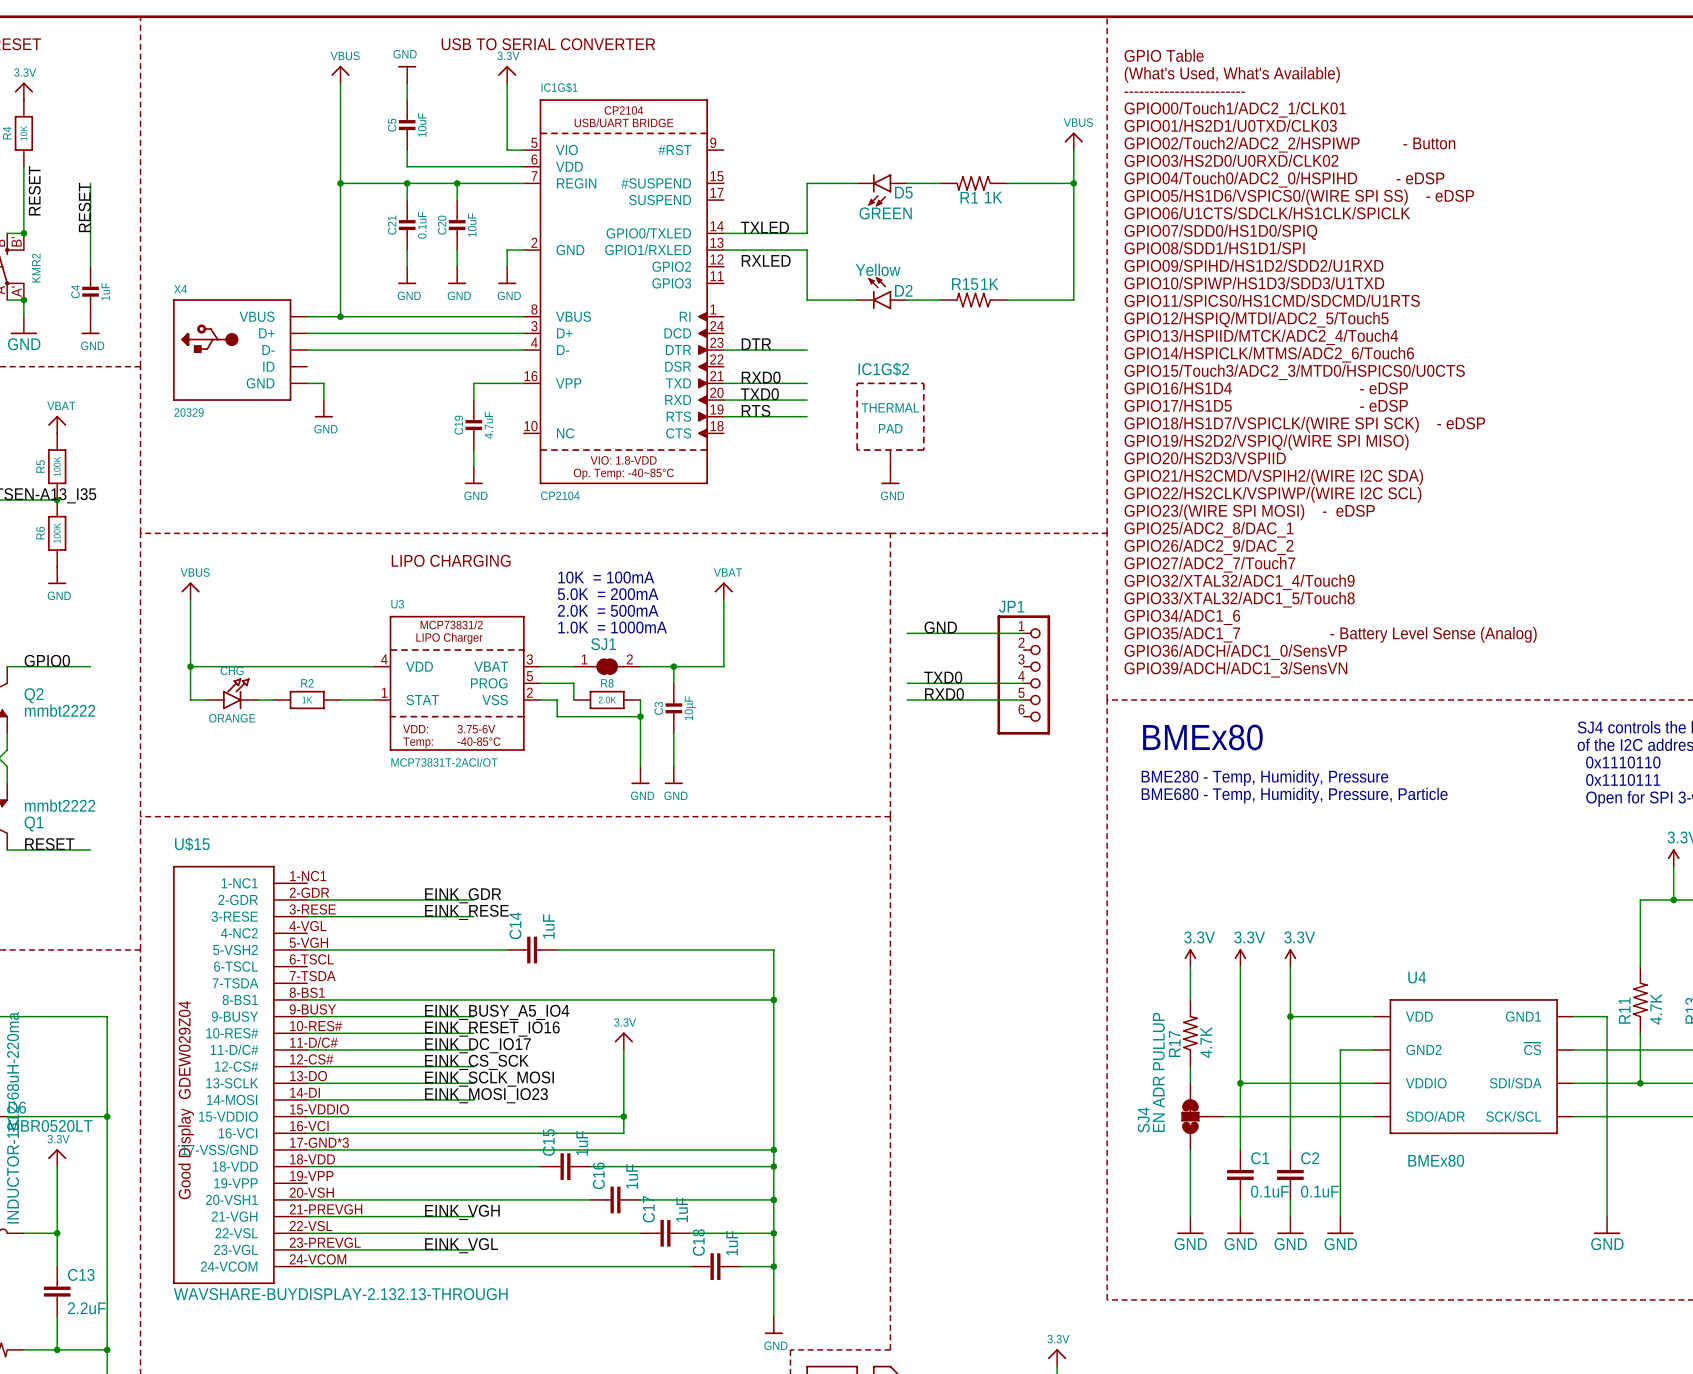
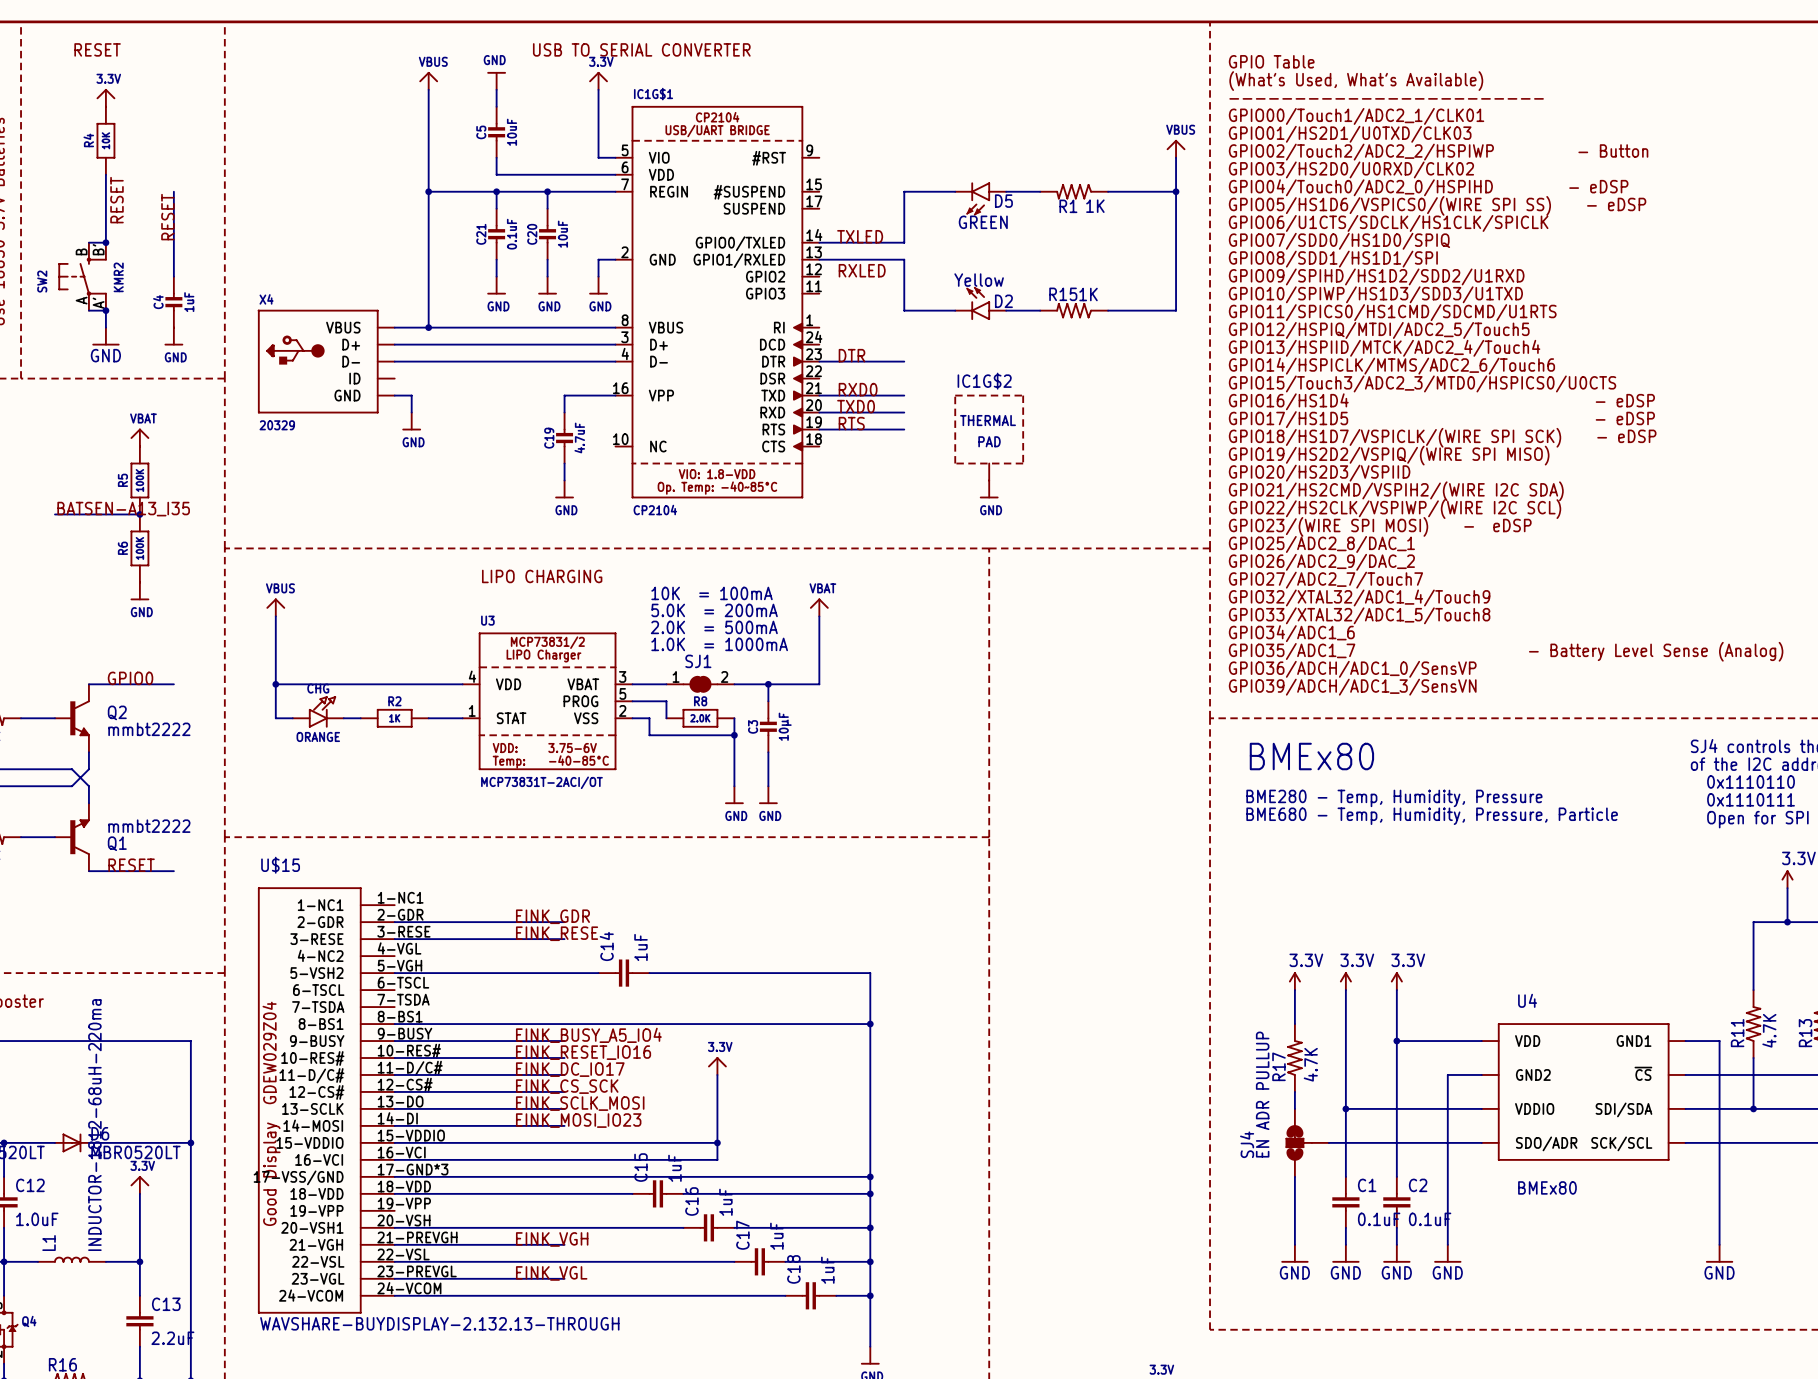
label: GND (940, 627) -> none
wire: (907, 633) (1023, 633) -> none
JP1: (1023, 675) -> none
label: TXD0 (943, 677) -> none
wire: (907, 683) (1023, 683) -> none
label: RXD0 (944, 694) -> none
wire: (907, 700) (1023, 700) -> none

